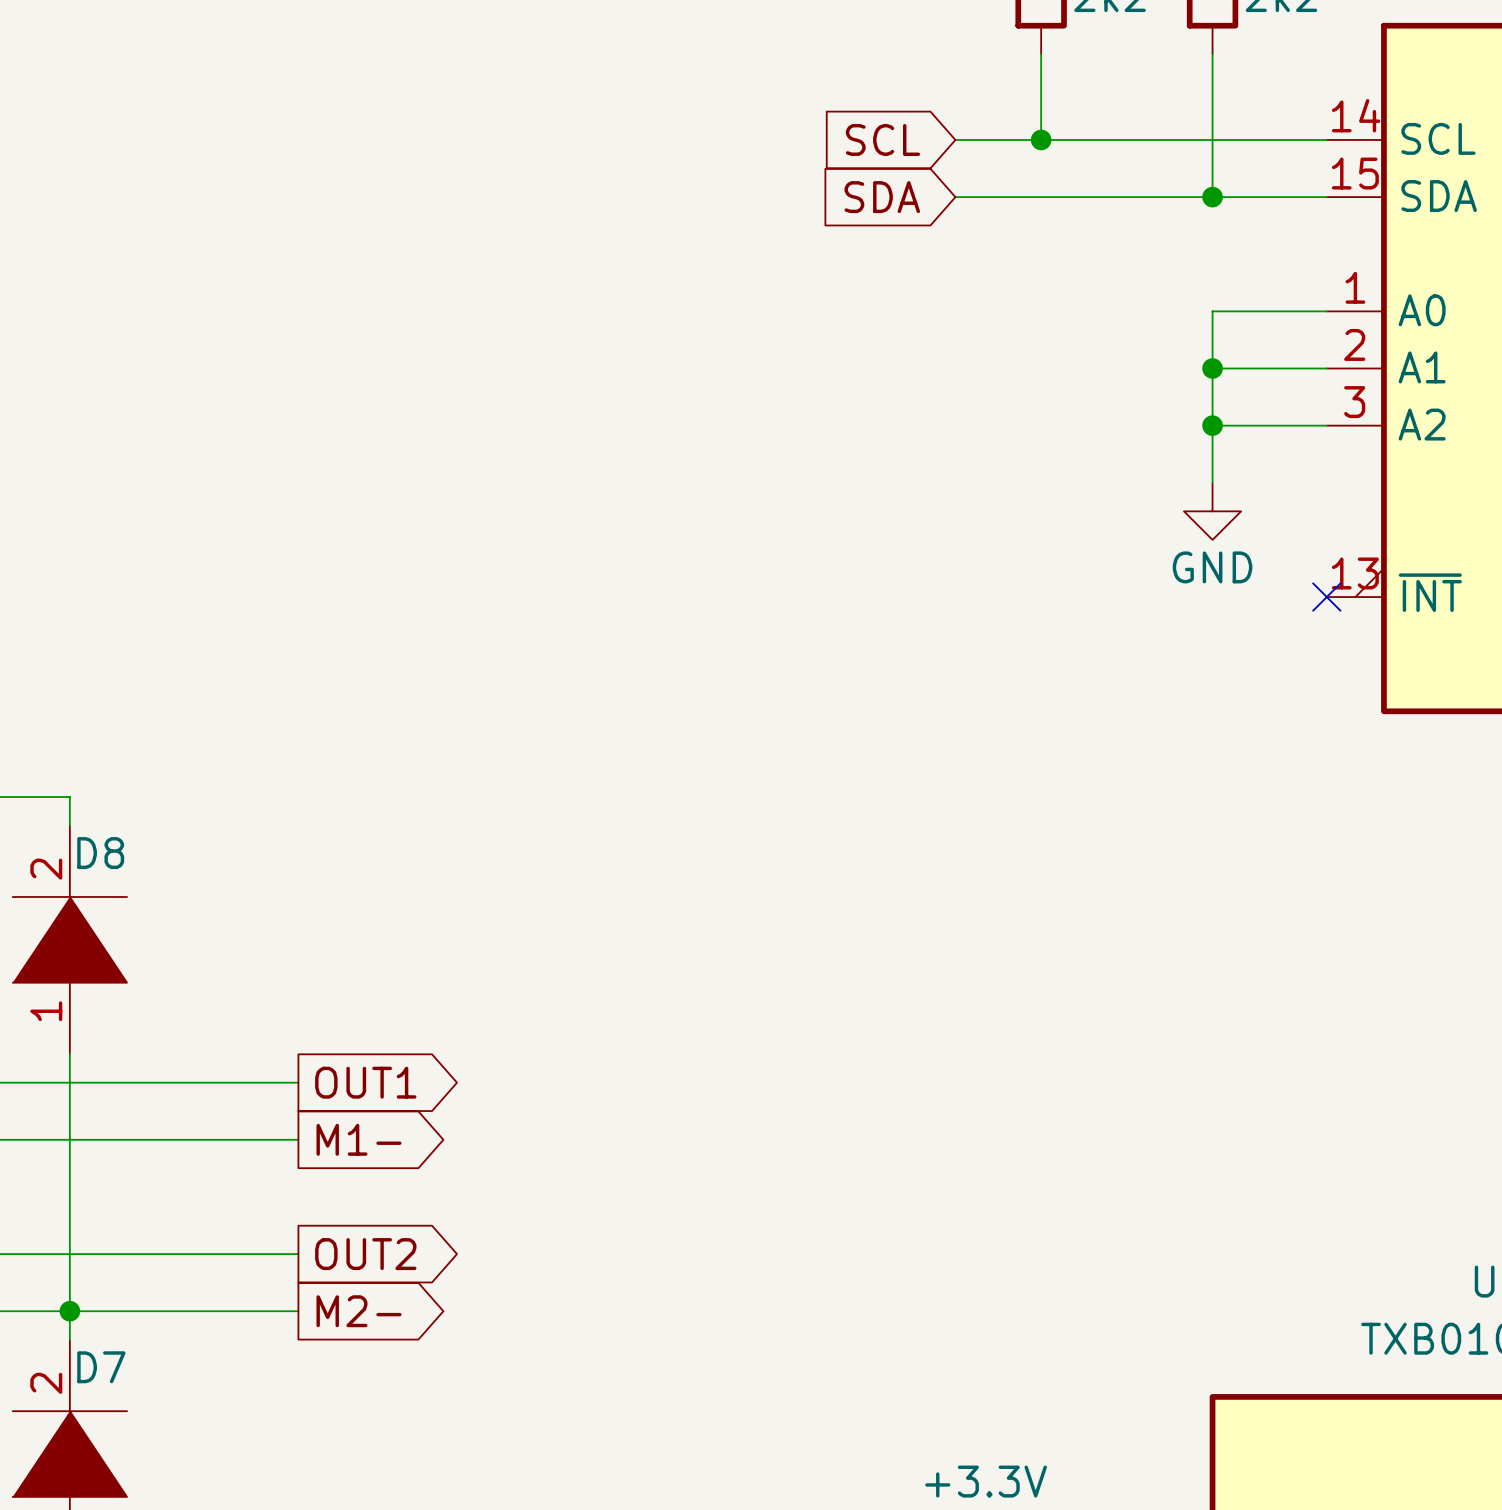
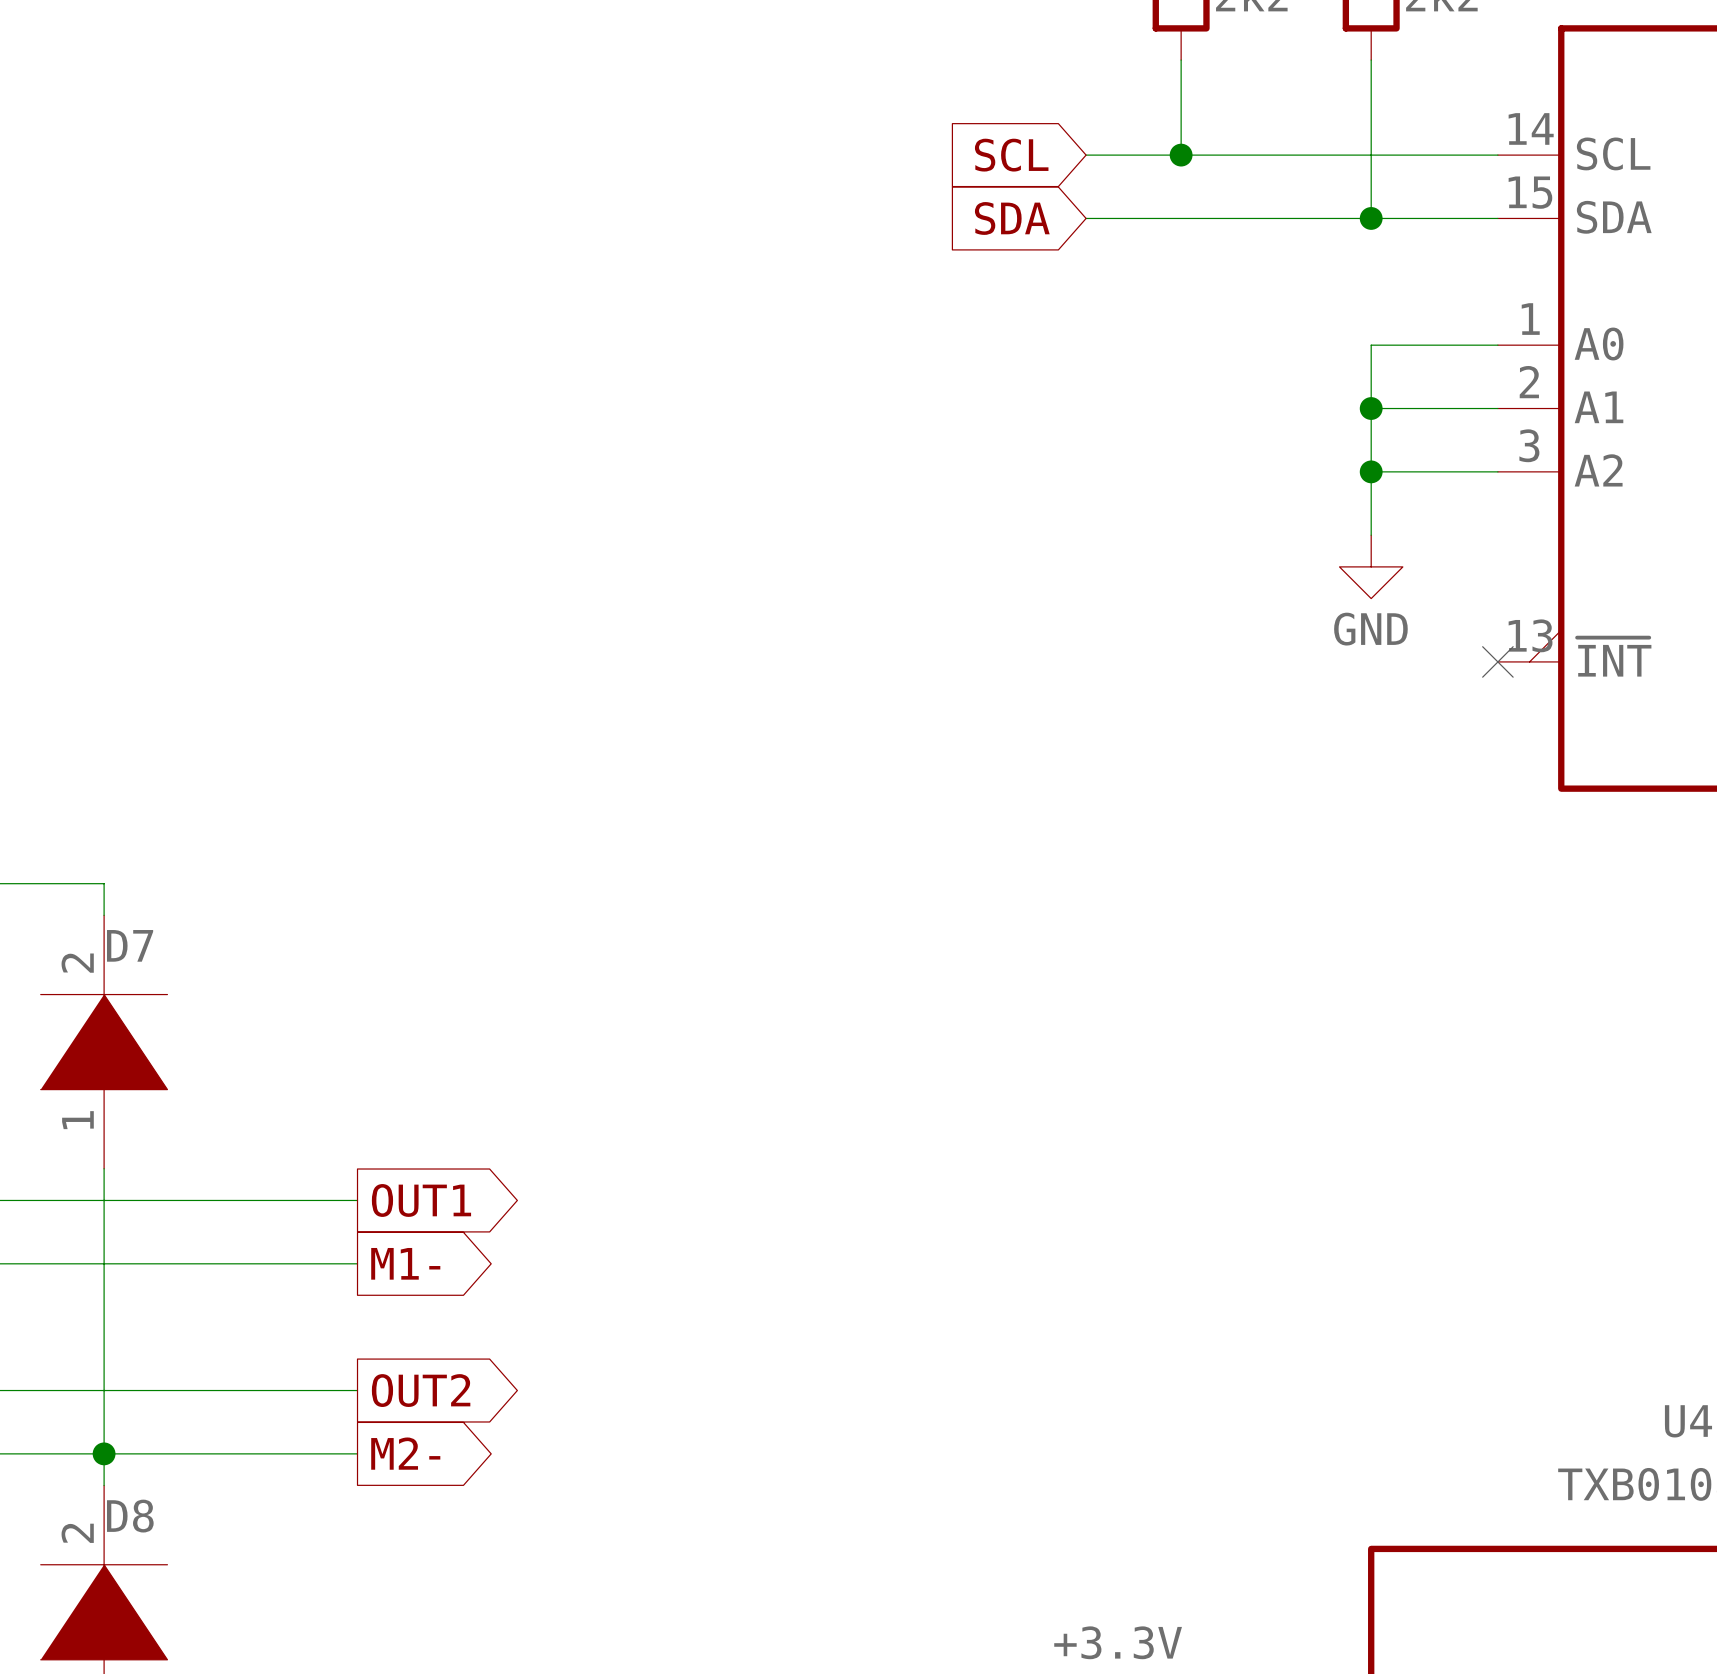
D8 name: D8 (100, 853) -> D7 (130, 945)
D7 name: D7 (101, 1367) -> D8 (130, 1516)

